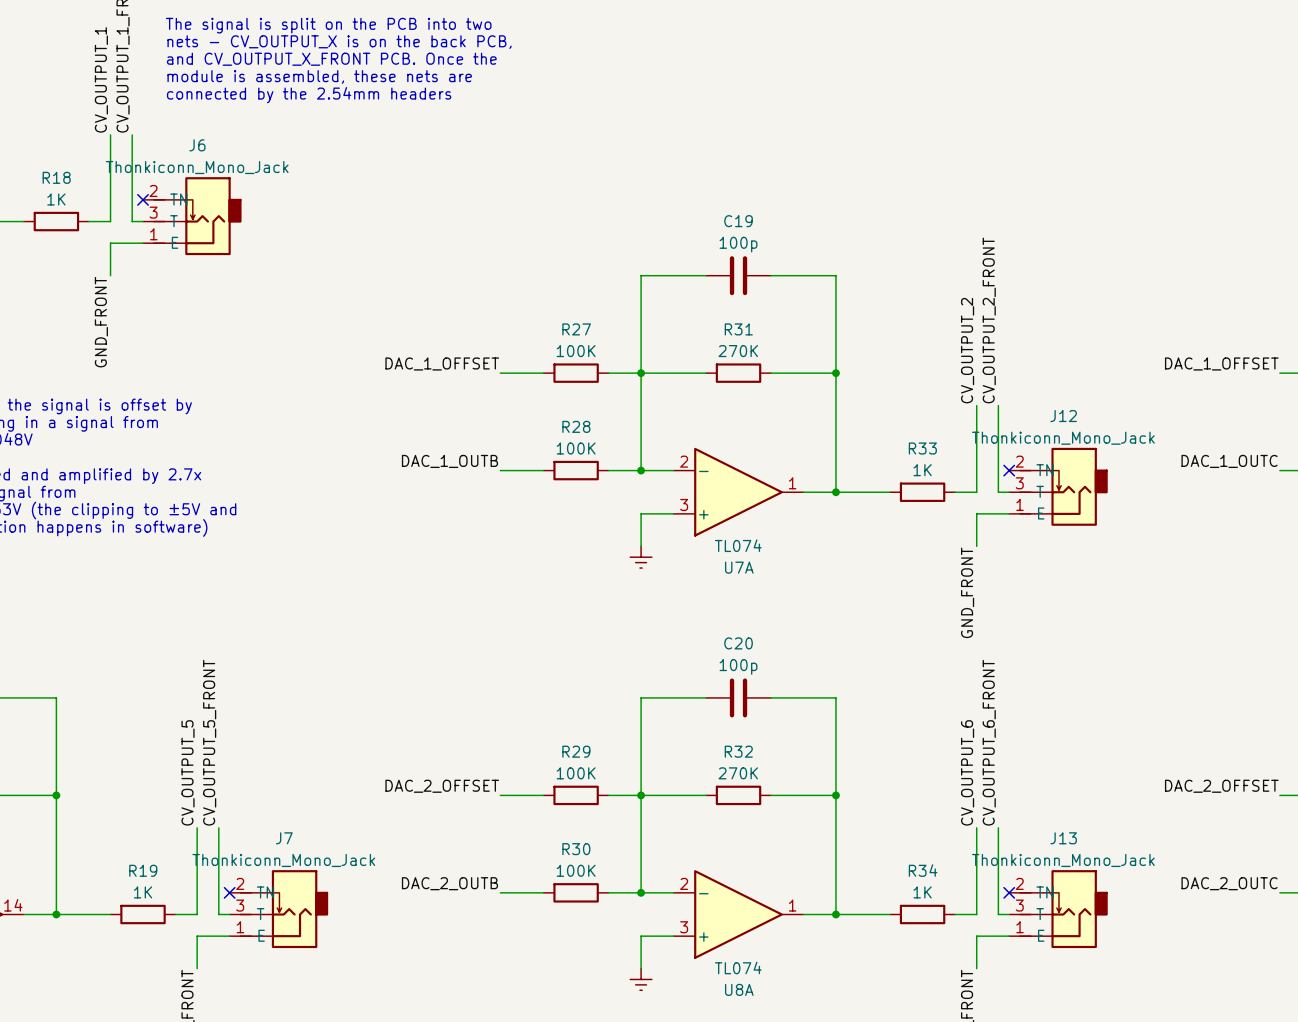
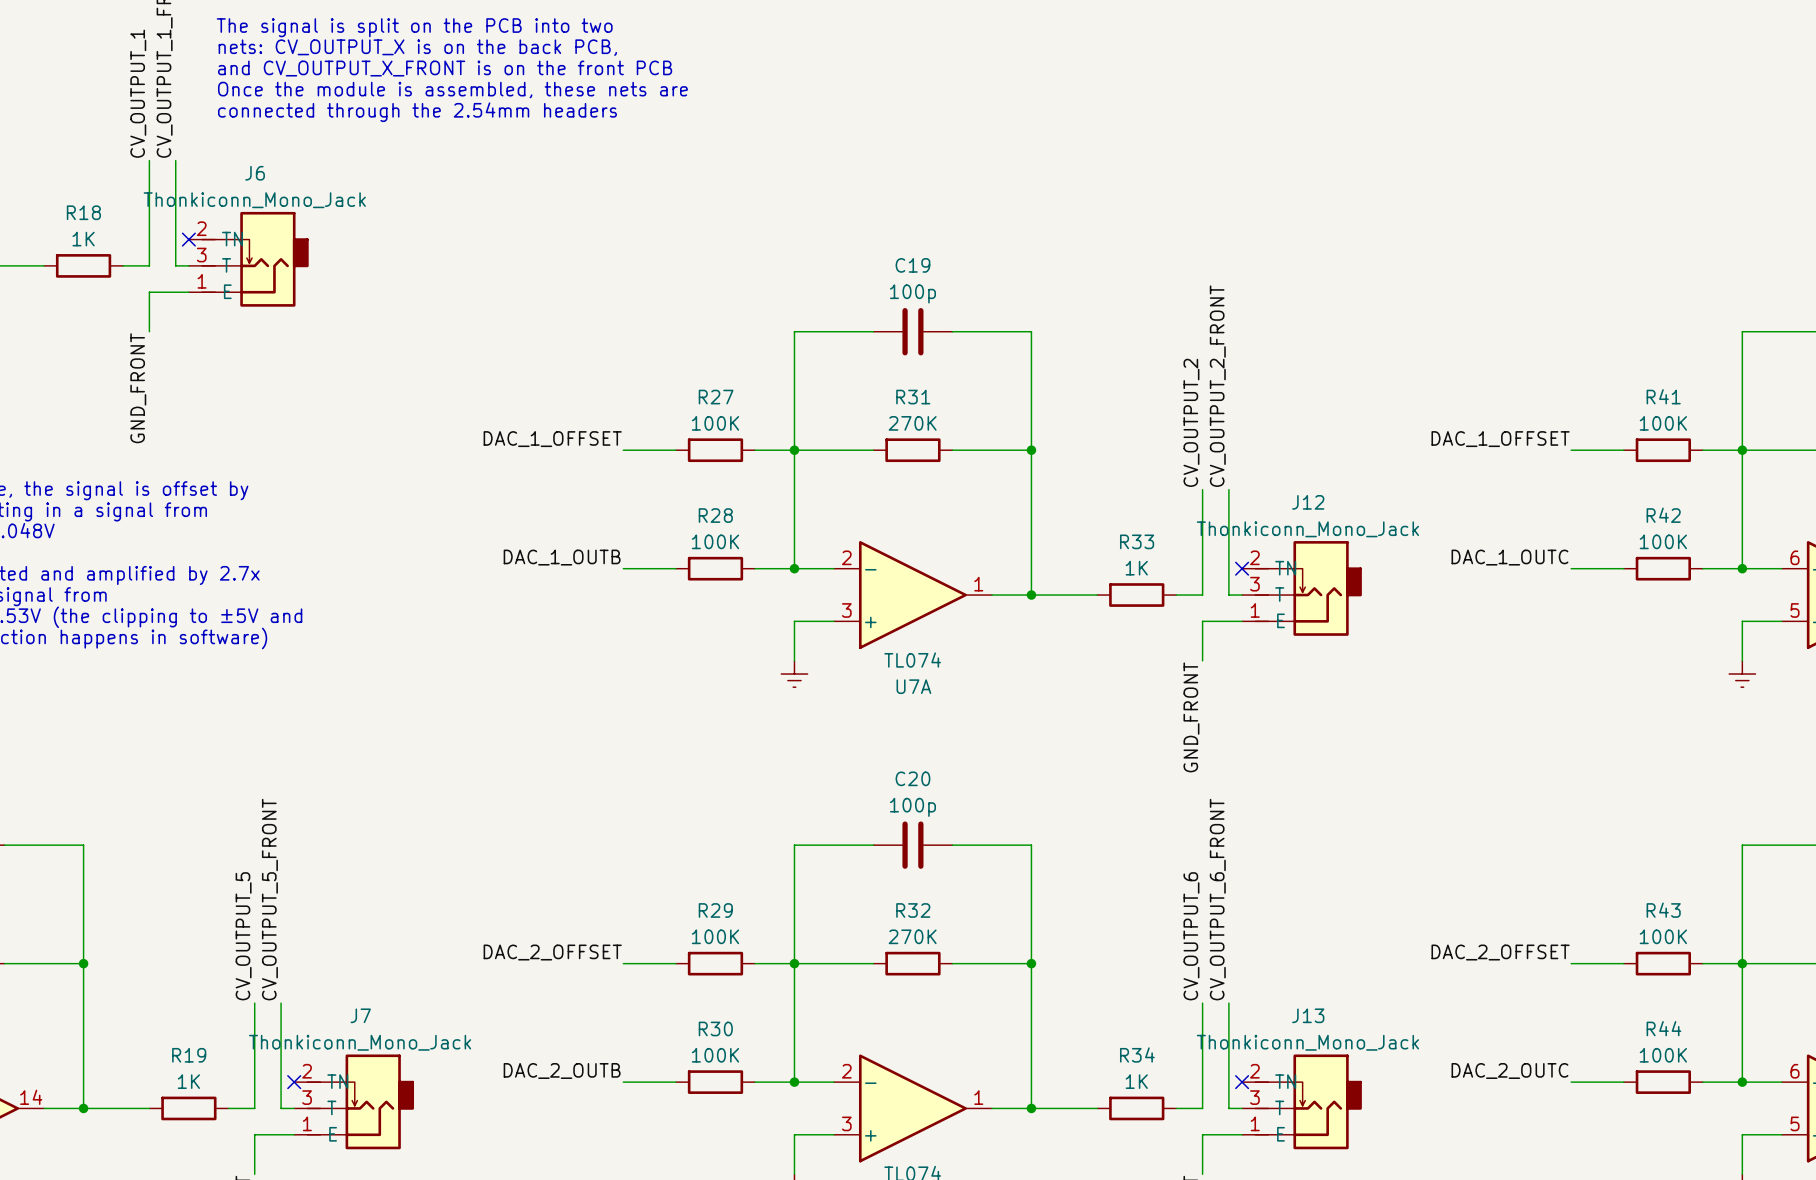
text: nets - CV_OUTPUT_X is on the back PCB, (339, 42) -> nets: CV_OUTPUT_X is on the back PCB, (417, 47)
text: and CV_OUTPUT_X_FRONT PCB. Once the (331, 59) -> and CV_OUTPUT_X_FRONT is on the front PCB (445, 68)
text: module is assembled, these nets are (319, 76) -> Once the module is assembled, these nets are (452, 90)
text: connected by the 2.54mm headers (309, 95) -> connected through the 2.54mm headers (417, 112)

